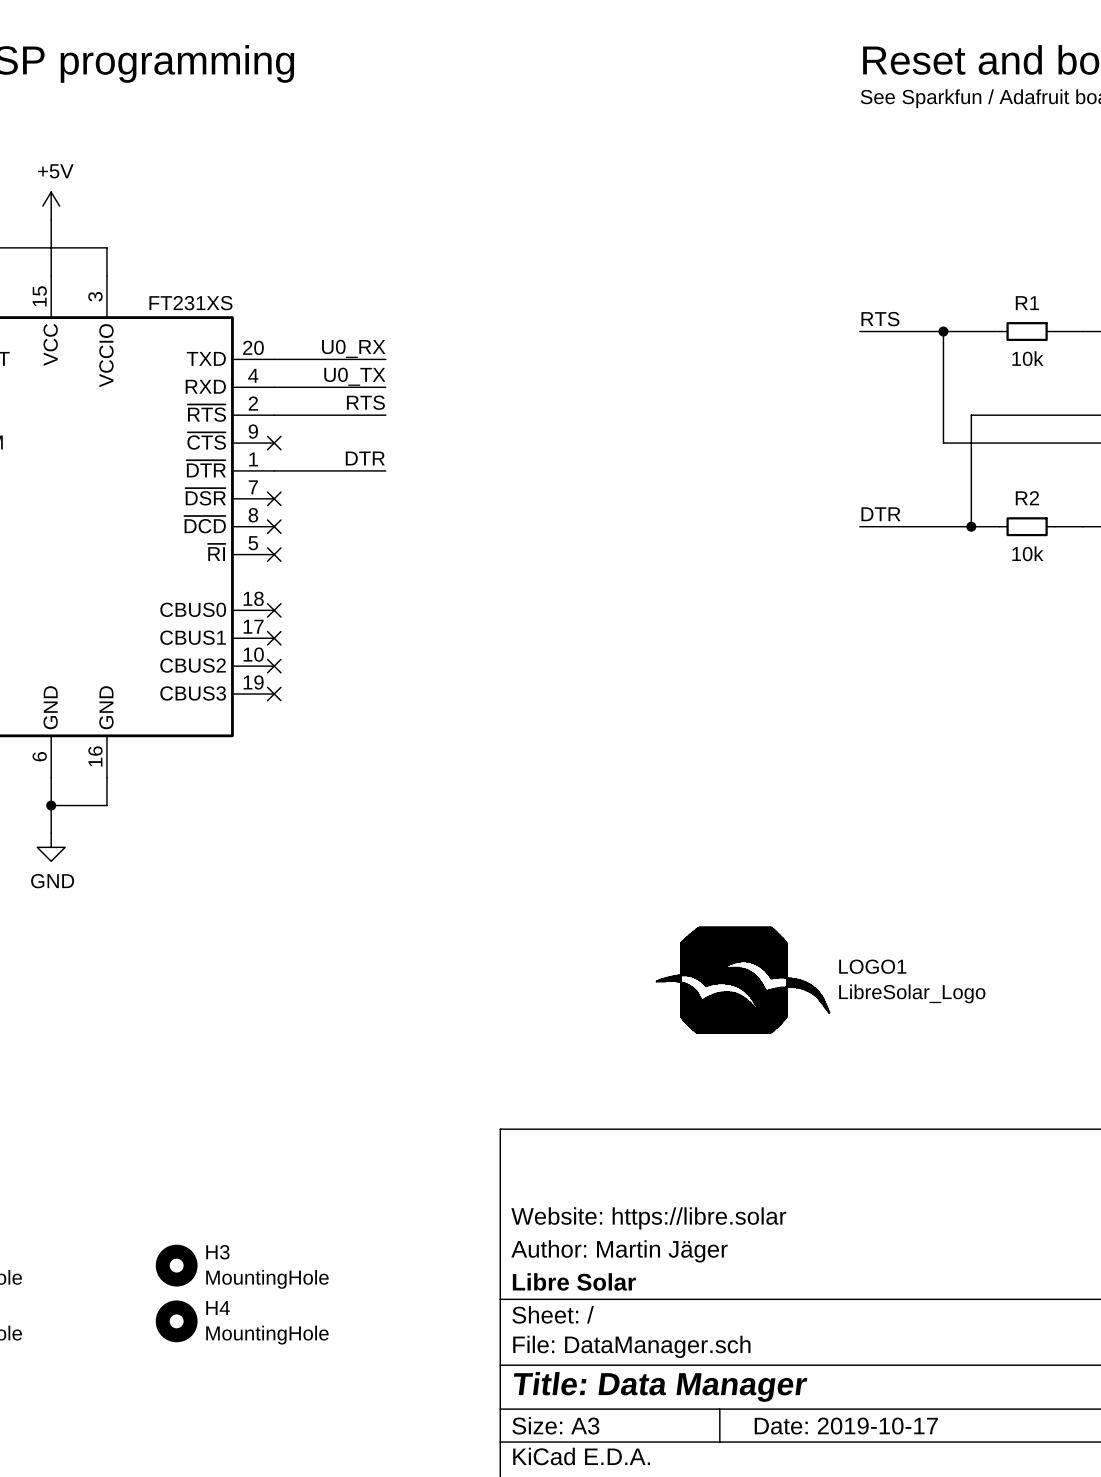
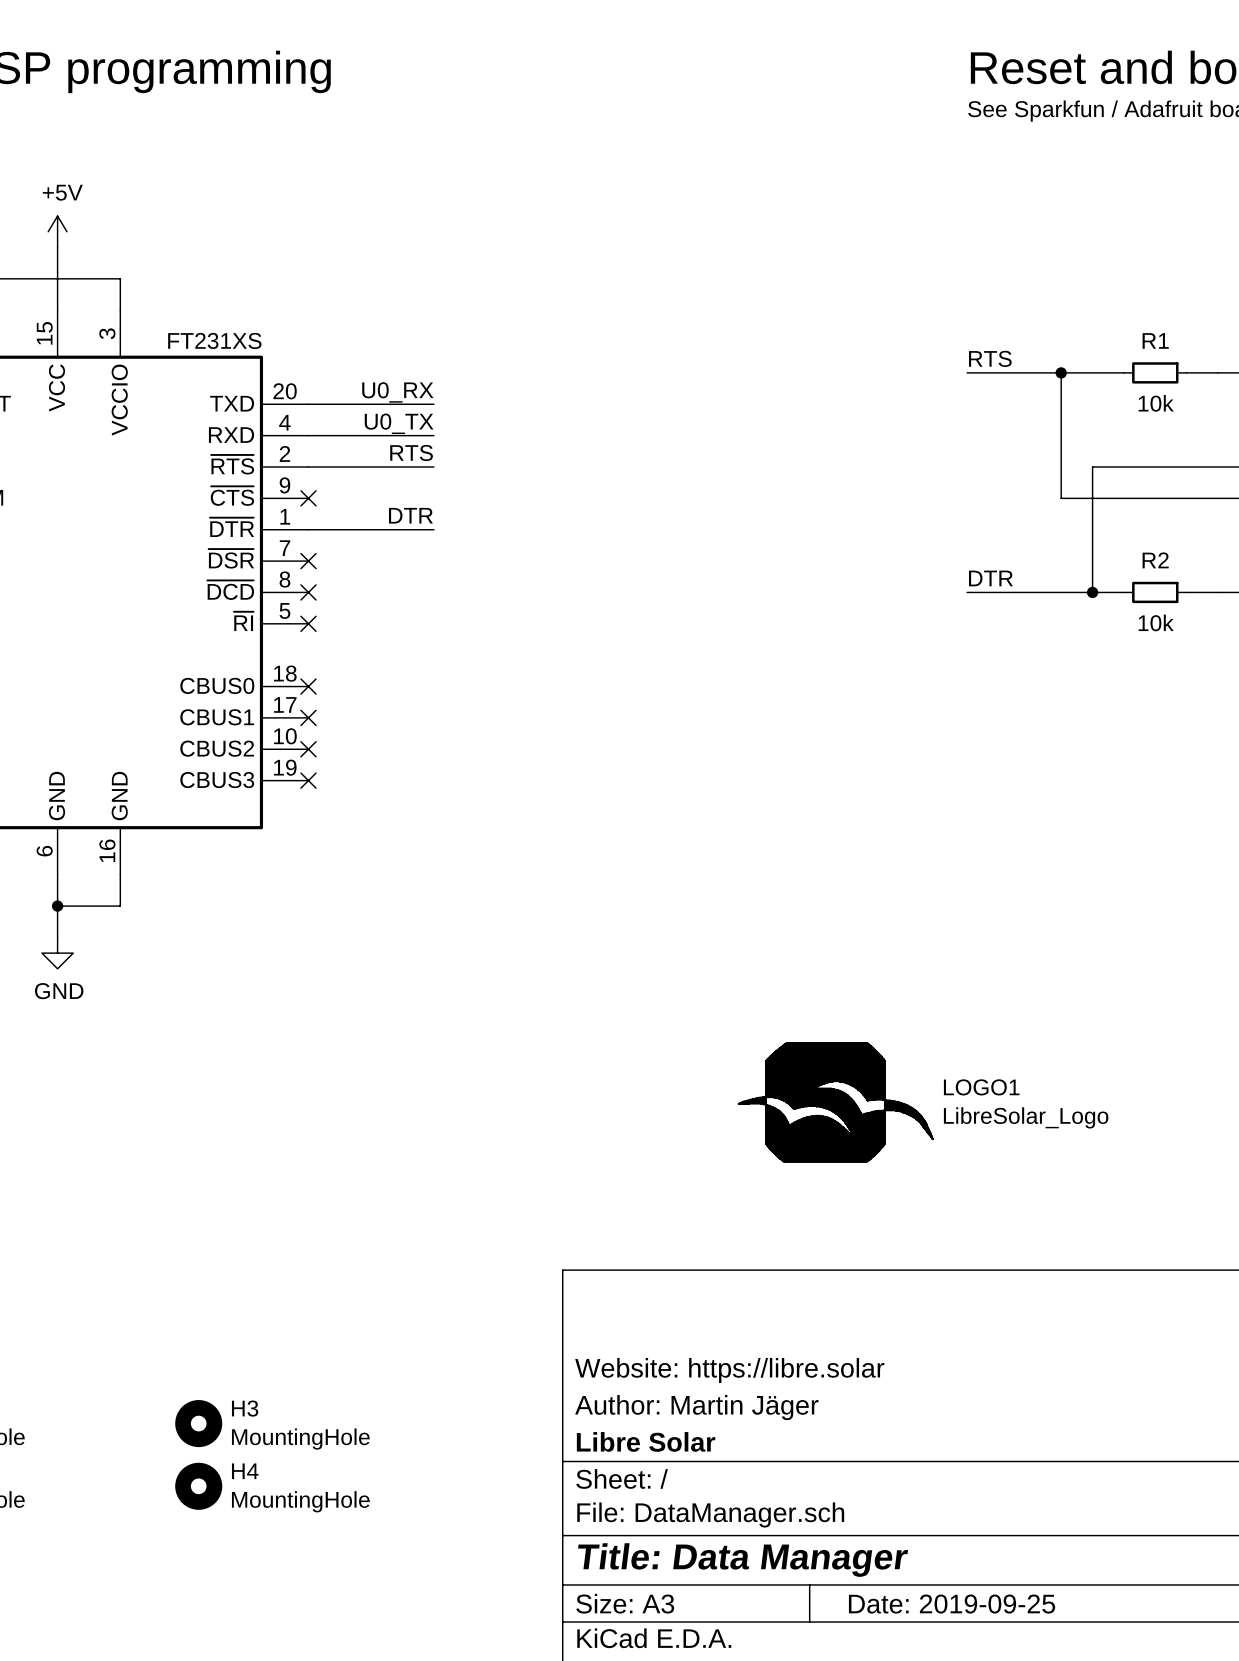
title block: Date: 2019-10-17 (846, 1426) -> Date: 2019-09-25 (952, 1604)

